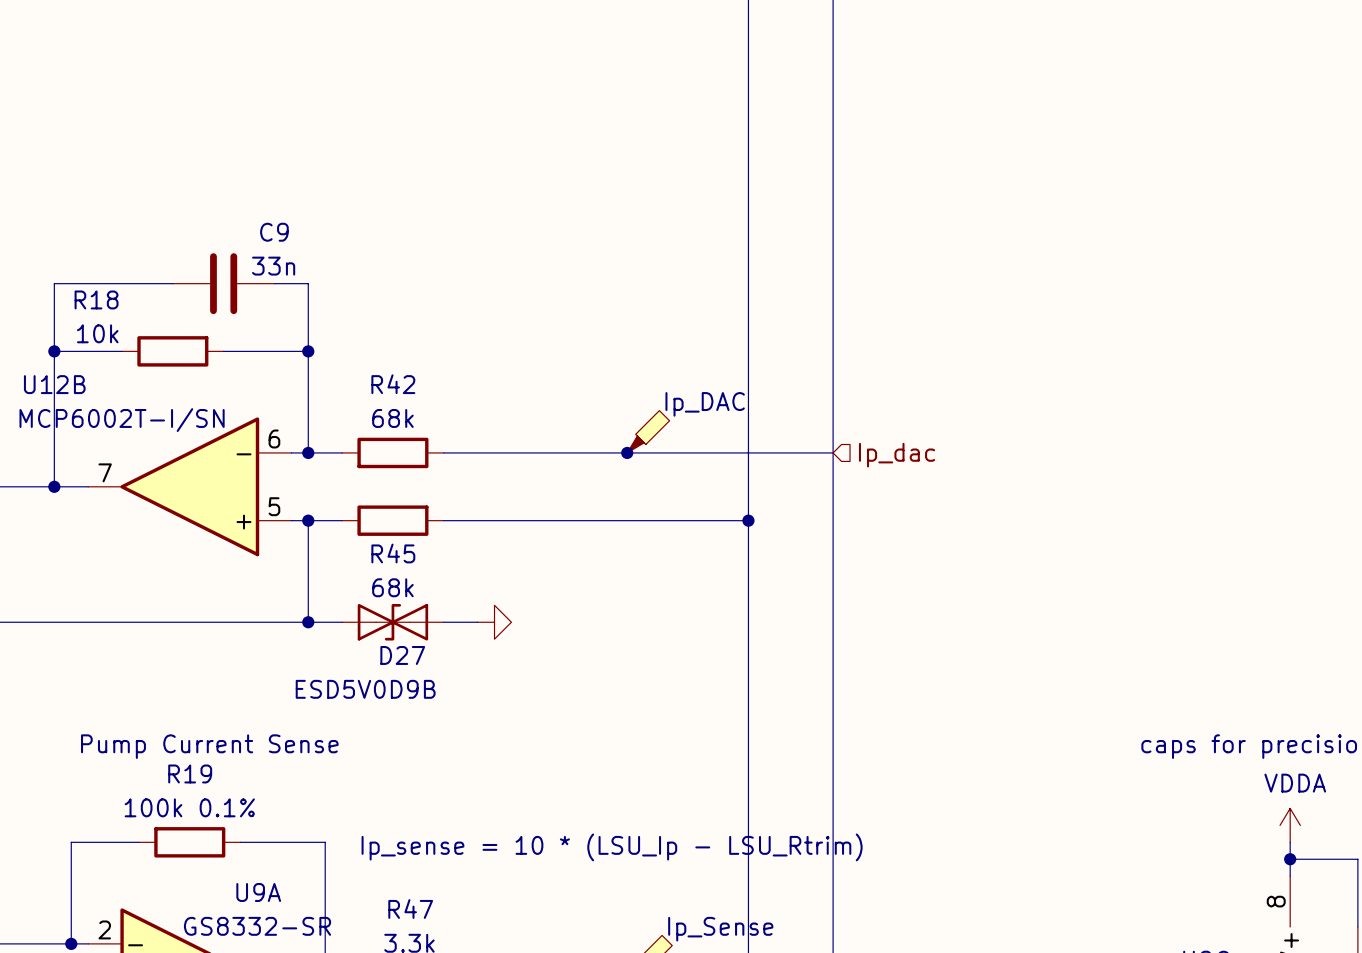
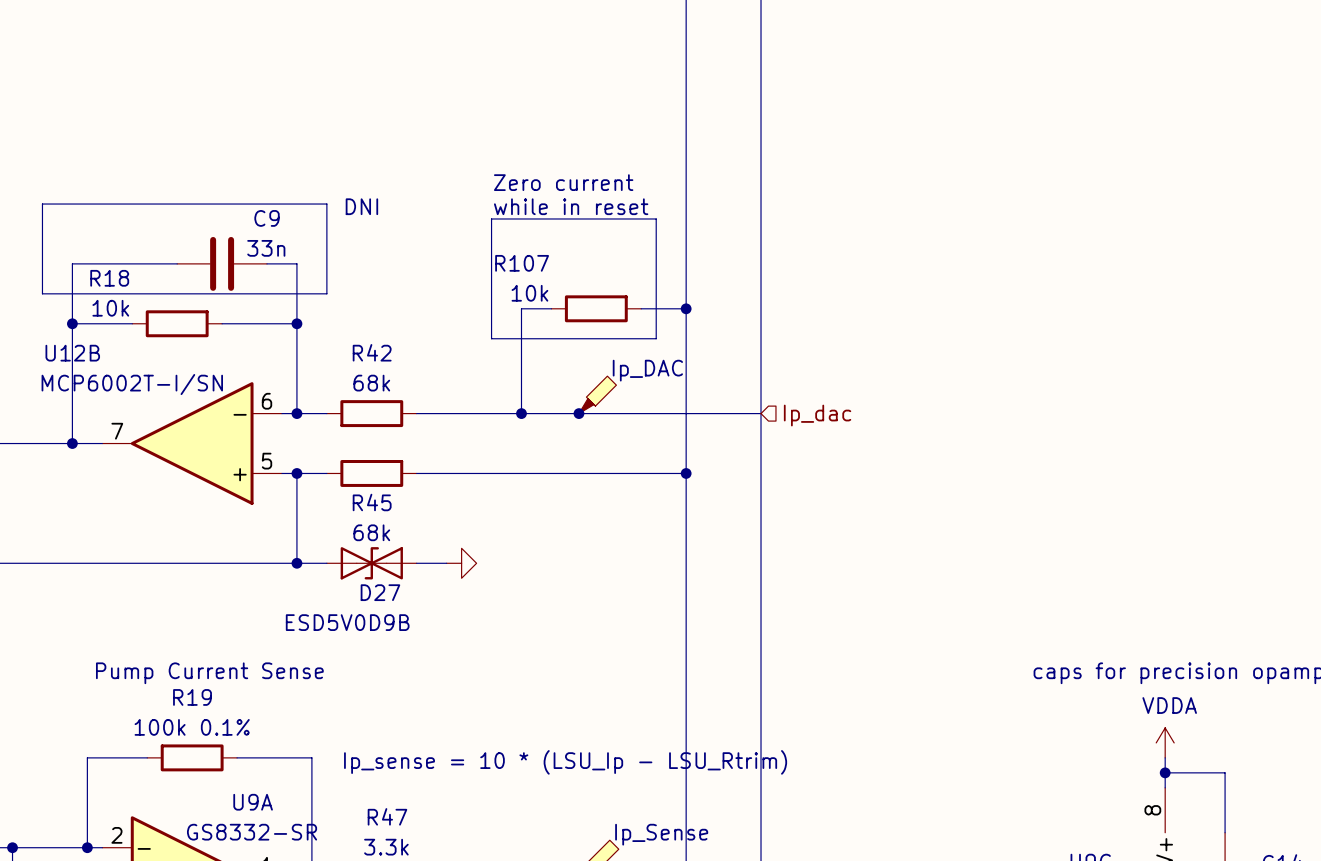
text: none -> Zero current (563, 182)
line: none -> (42, 204) (42, 293) (326, 293) (326, 204) (42, 204)
text: none -> DNI (361, 206)
text: none -> while in reset (571, 206)
line: none -> (491, 218) (656, 218) (656, 338) (491, 338) (491, 218)
wire: none -> (551, 308) (521, 308) (521, 413)
R107: none -> 10k (596, 308)
wire: none -> (641, 308) (686, 308)
junction: none -> (686, 308)
junction: none -> (521, 413)

